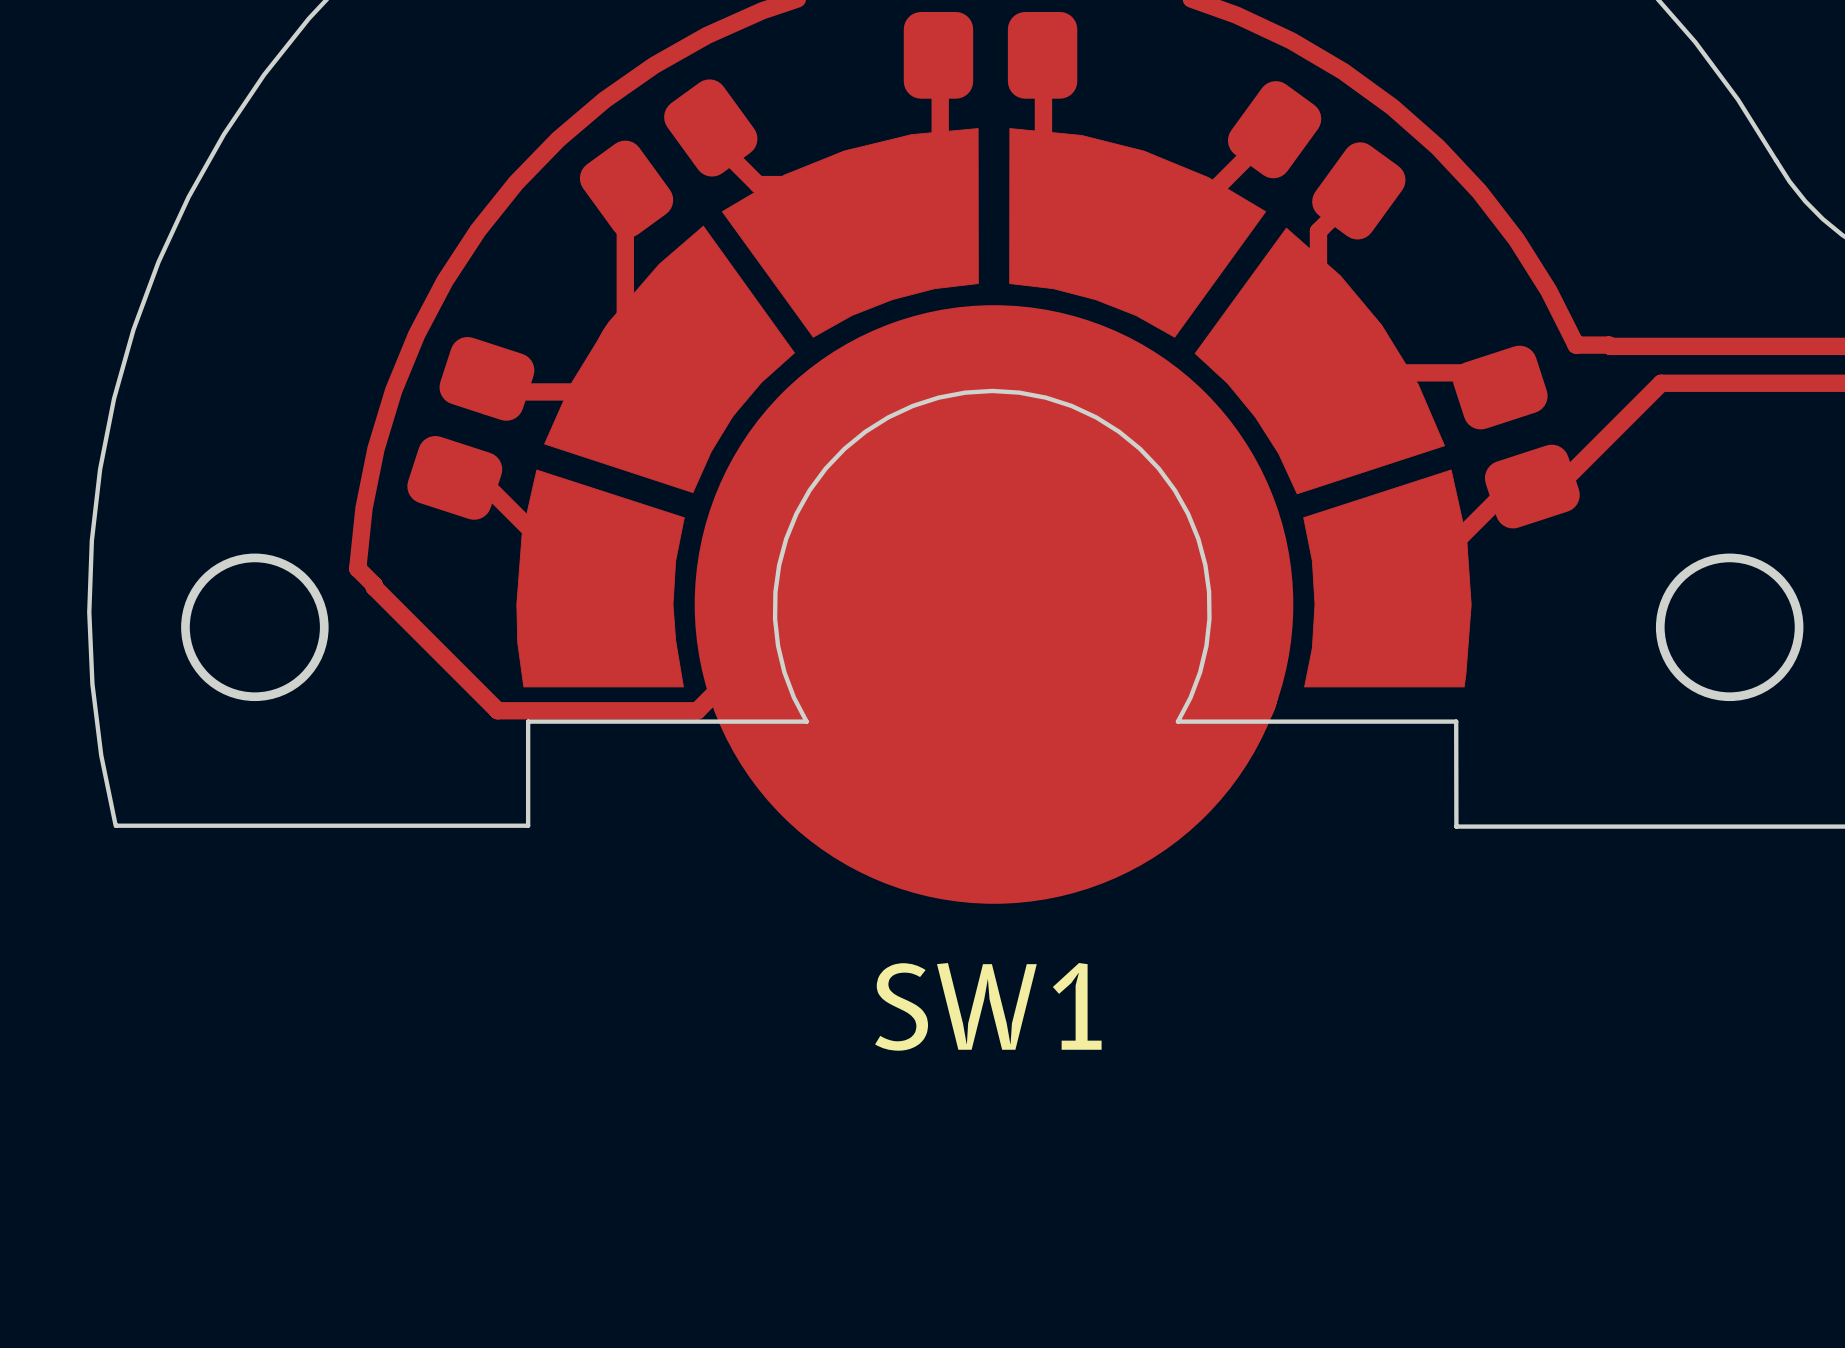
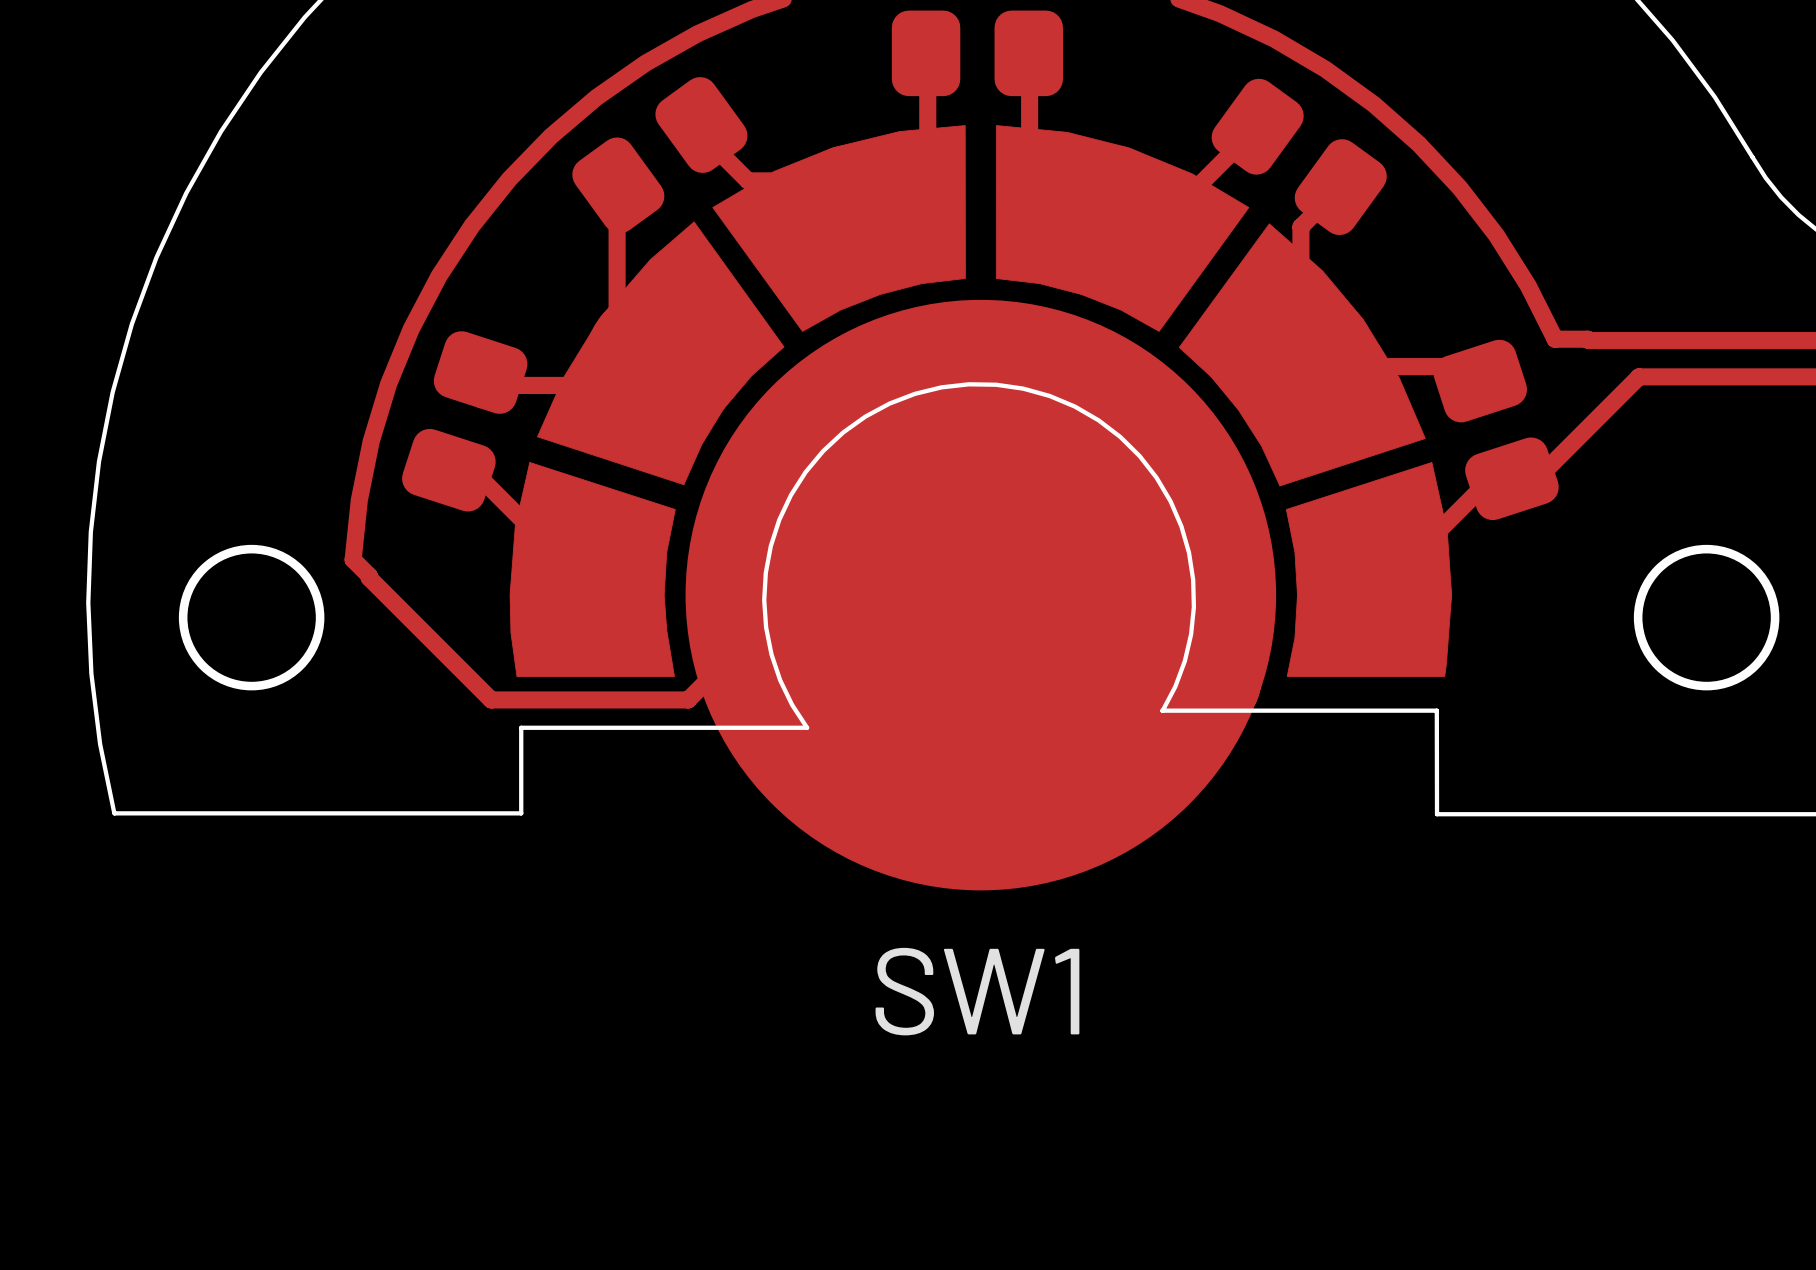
board edge: (1177, 721) (1190, 697) (1200, 672) (1206, 645) (1209, 619) (1209, 592) (1205, 565) (1198, 539) (1188, 513) (1174, 490) (1158, 468) (1140, 448) (1119, 431) (1096, 417) (1071, 405) (1045, 397) (1019, 392) (992, 390) (965, 392) (938, 397) (912, 405) (888, 417) (865, 431) (844, 448) (825, 468) (809, 490) (796, 513) (786, 539) (779, 565) (775, 592) (775, 619) (778, 645) (784, 672) (793, 697) (806, 721) (528, 721) (528, 738) -> (1162, 710) (1175, 686) (1184, 661) (1191, 634) (1193, 607) (1193, 579) (1189, 552) (1181, 526) (1170, 501) (1156, 477) (1139, 456) (1120, 436) (1098, 420) (1074, 406) (1049, 395) (1023, 388) (996, 384) (968, 384) (941, 387) (915, 393) (889, 403) (865, 416) (843, 432) (823, 451) (805, 472) (790, 495) (779, 519) (770, 545) (765, 572) (764, 600) (766, 627) (771, 654) (780, 680) (792, 704) (807, 727) (521, 727)

